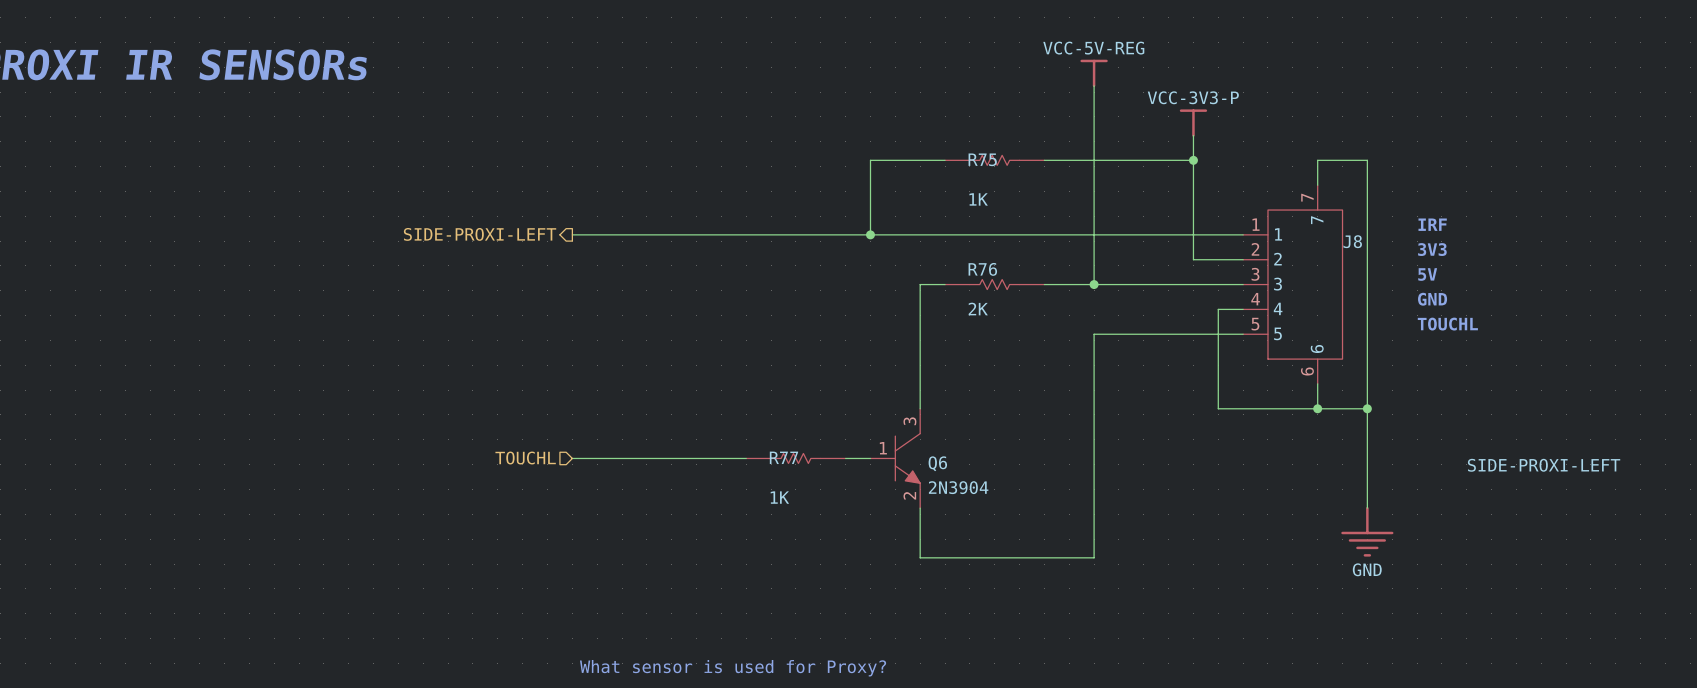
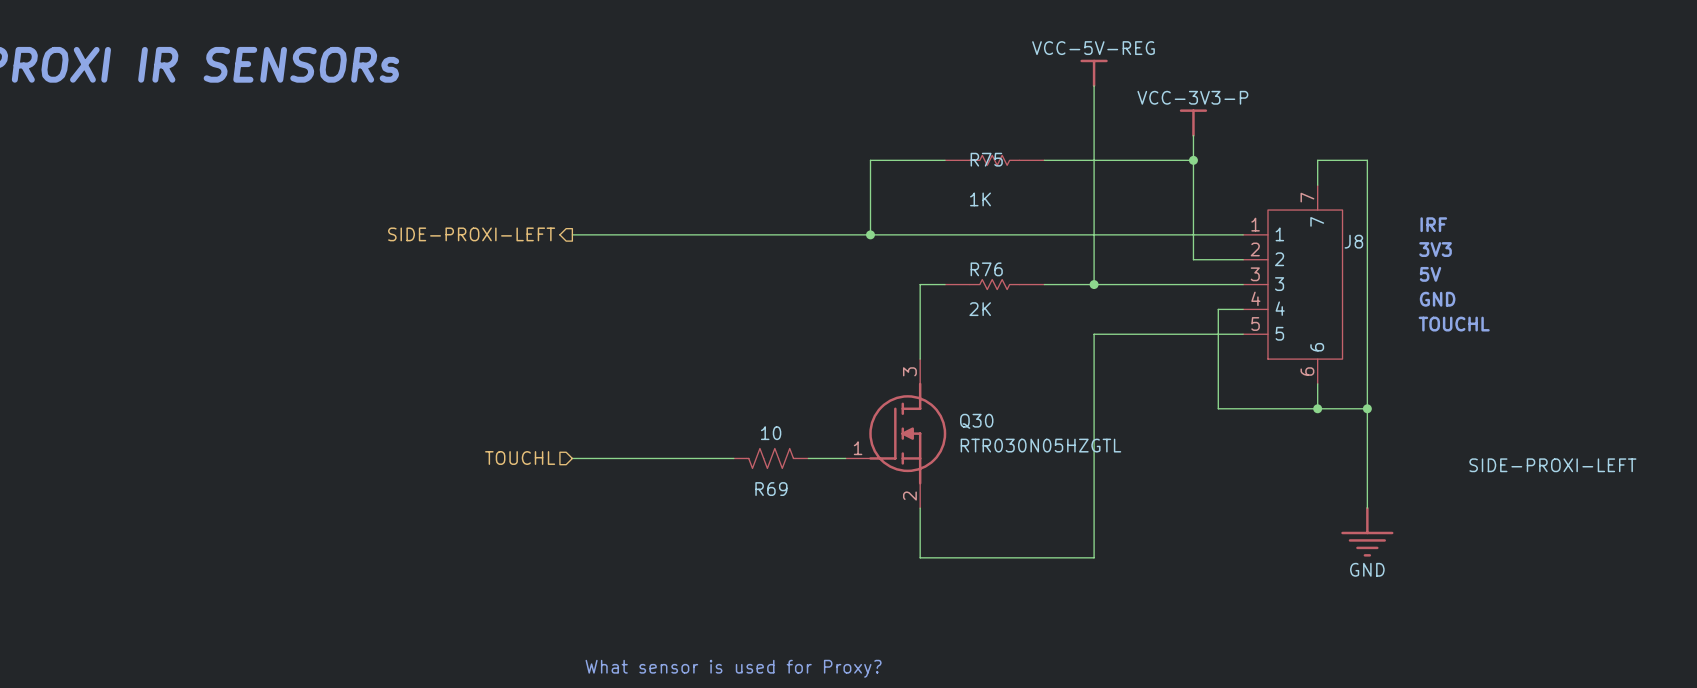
Q30: none -> RTR030N05HZGTL (895, 433)
R69: none -> 10 (771, 458)
R77: 1K (795, 458) -> none
Q6: 2N3904 (895, 458) -> none

